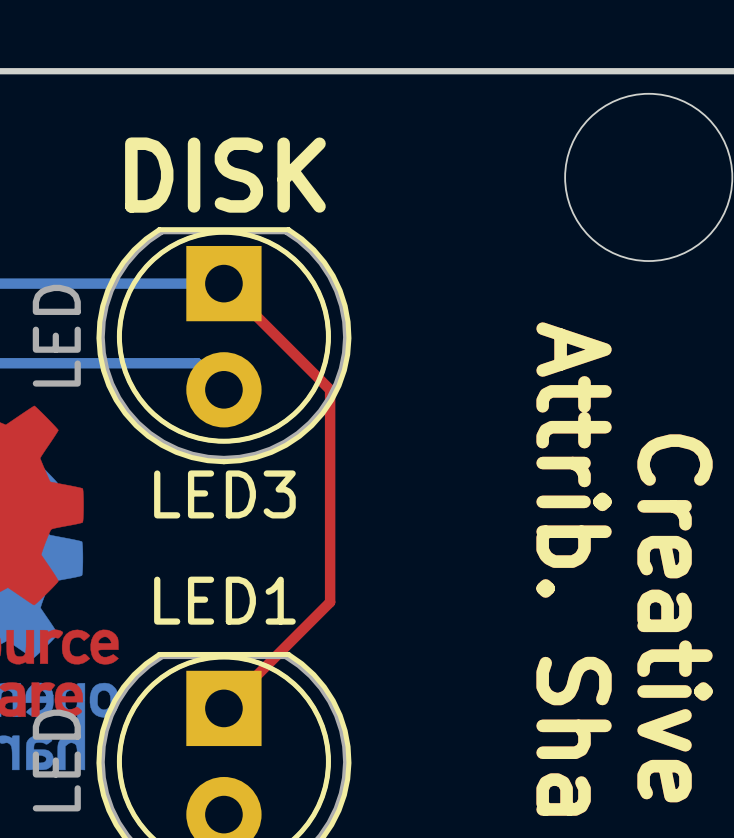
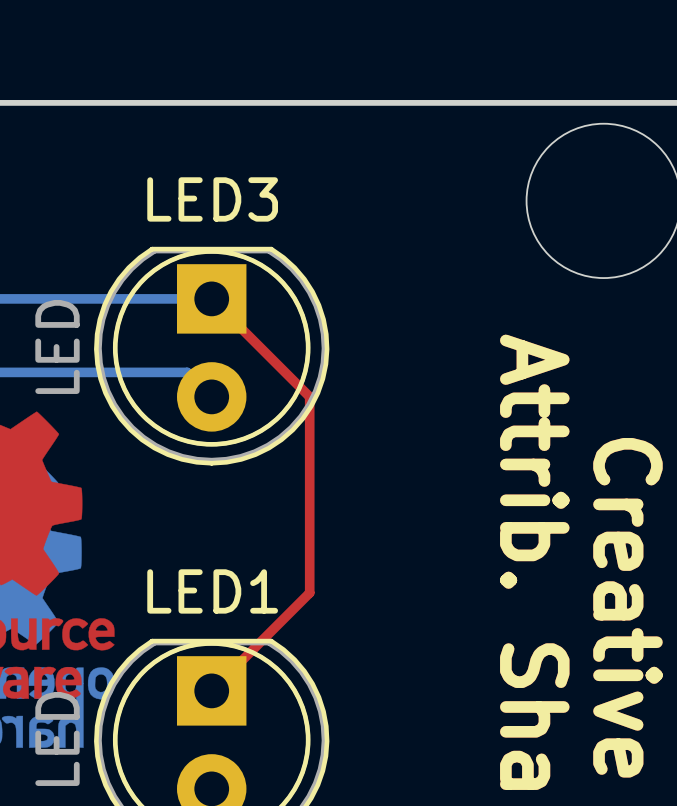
text: DISK (225, 175) -> none
LED3 name position: LED3 (224, 494) -> LED3 (212, 199)

